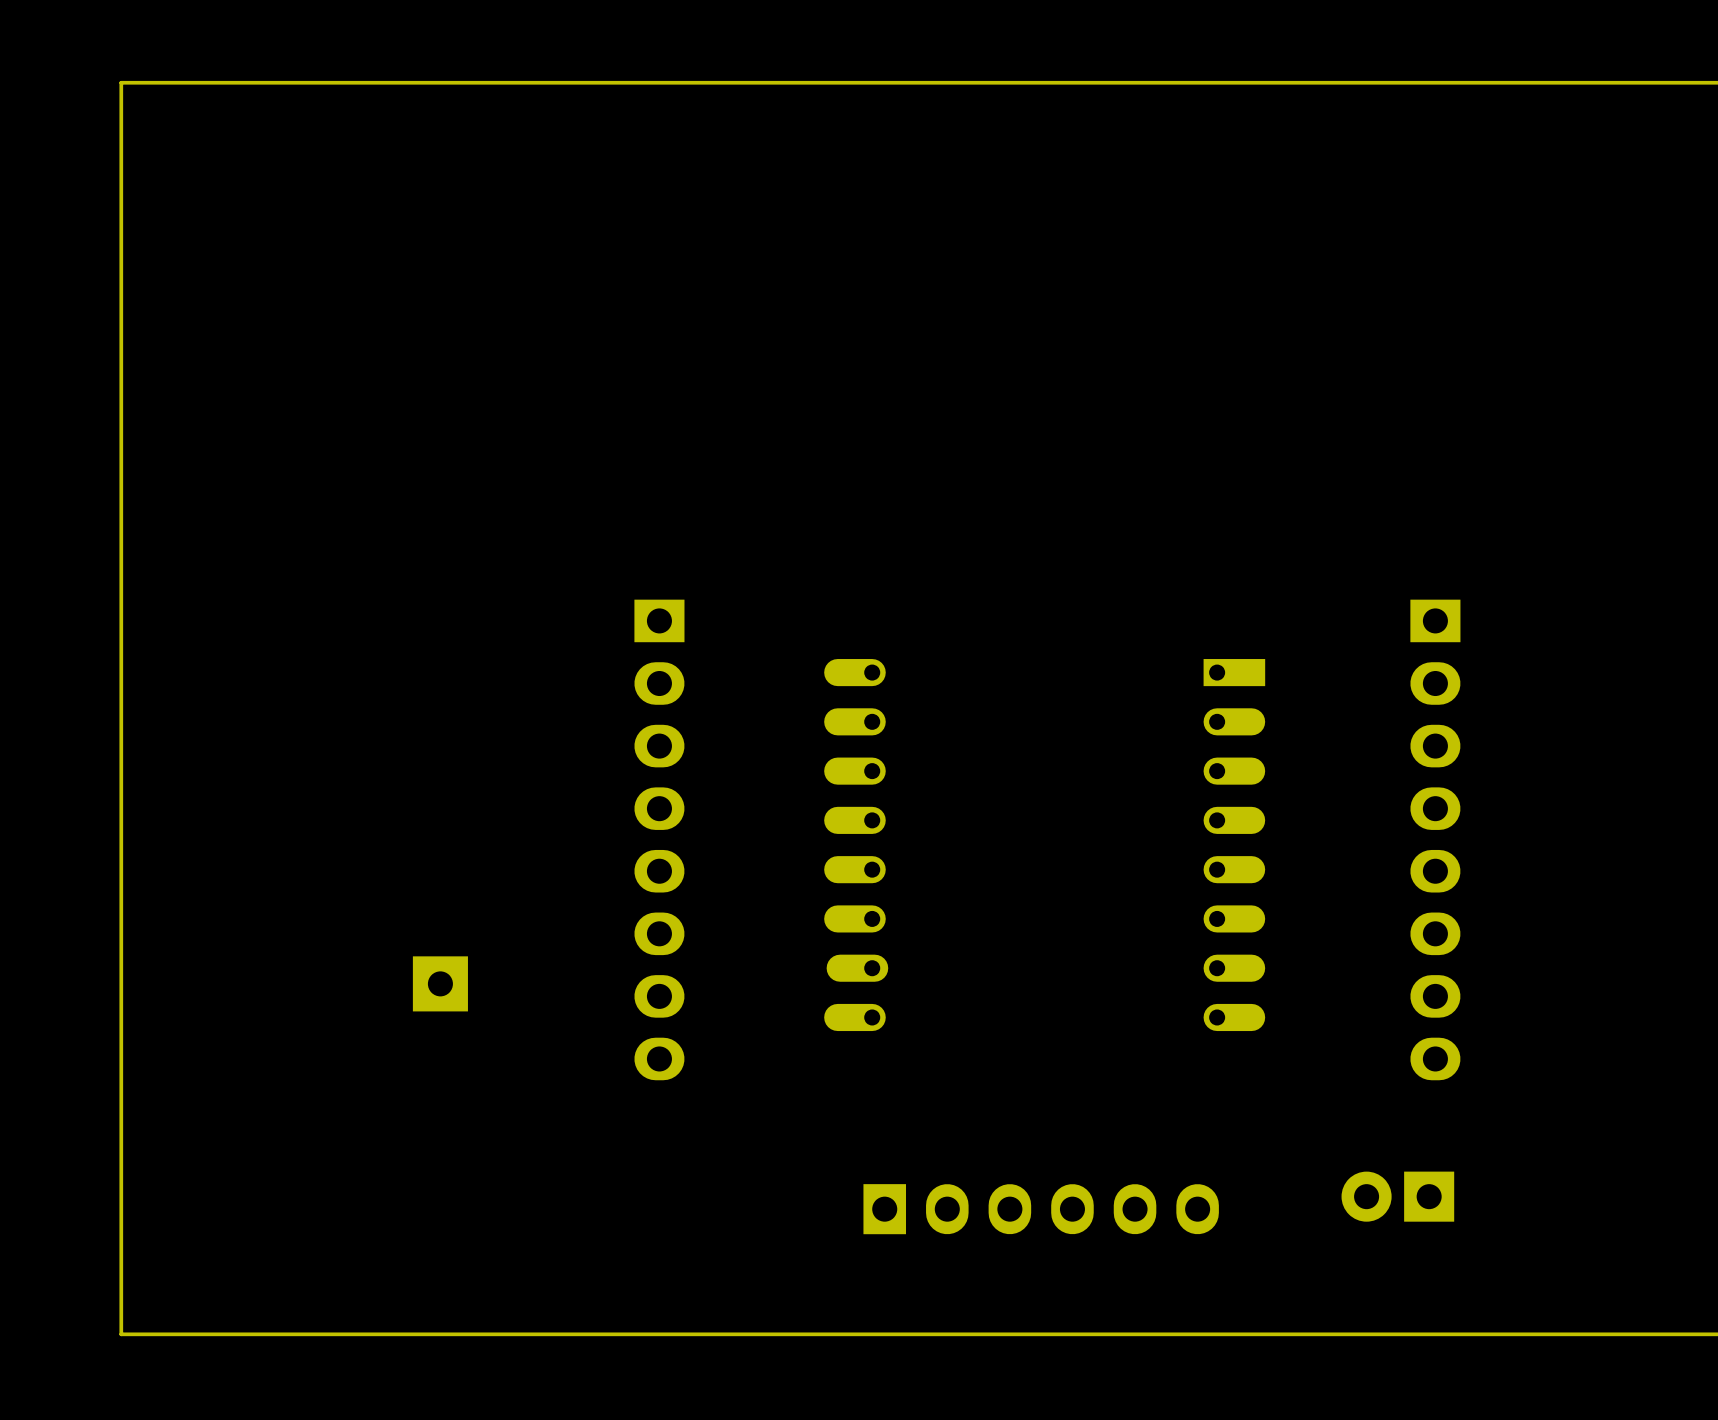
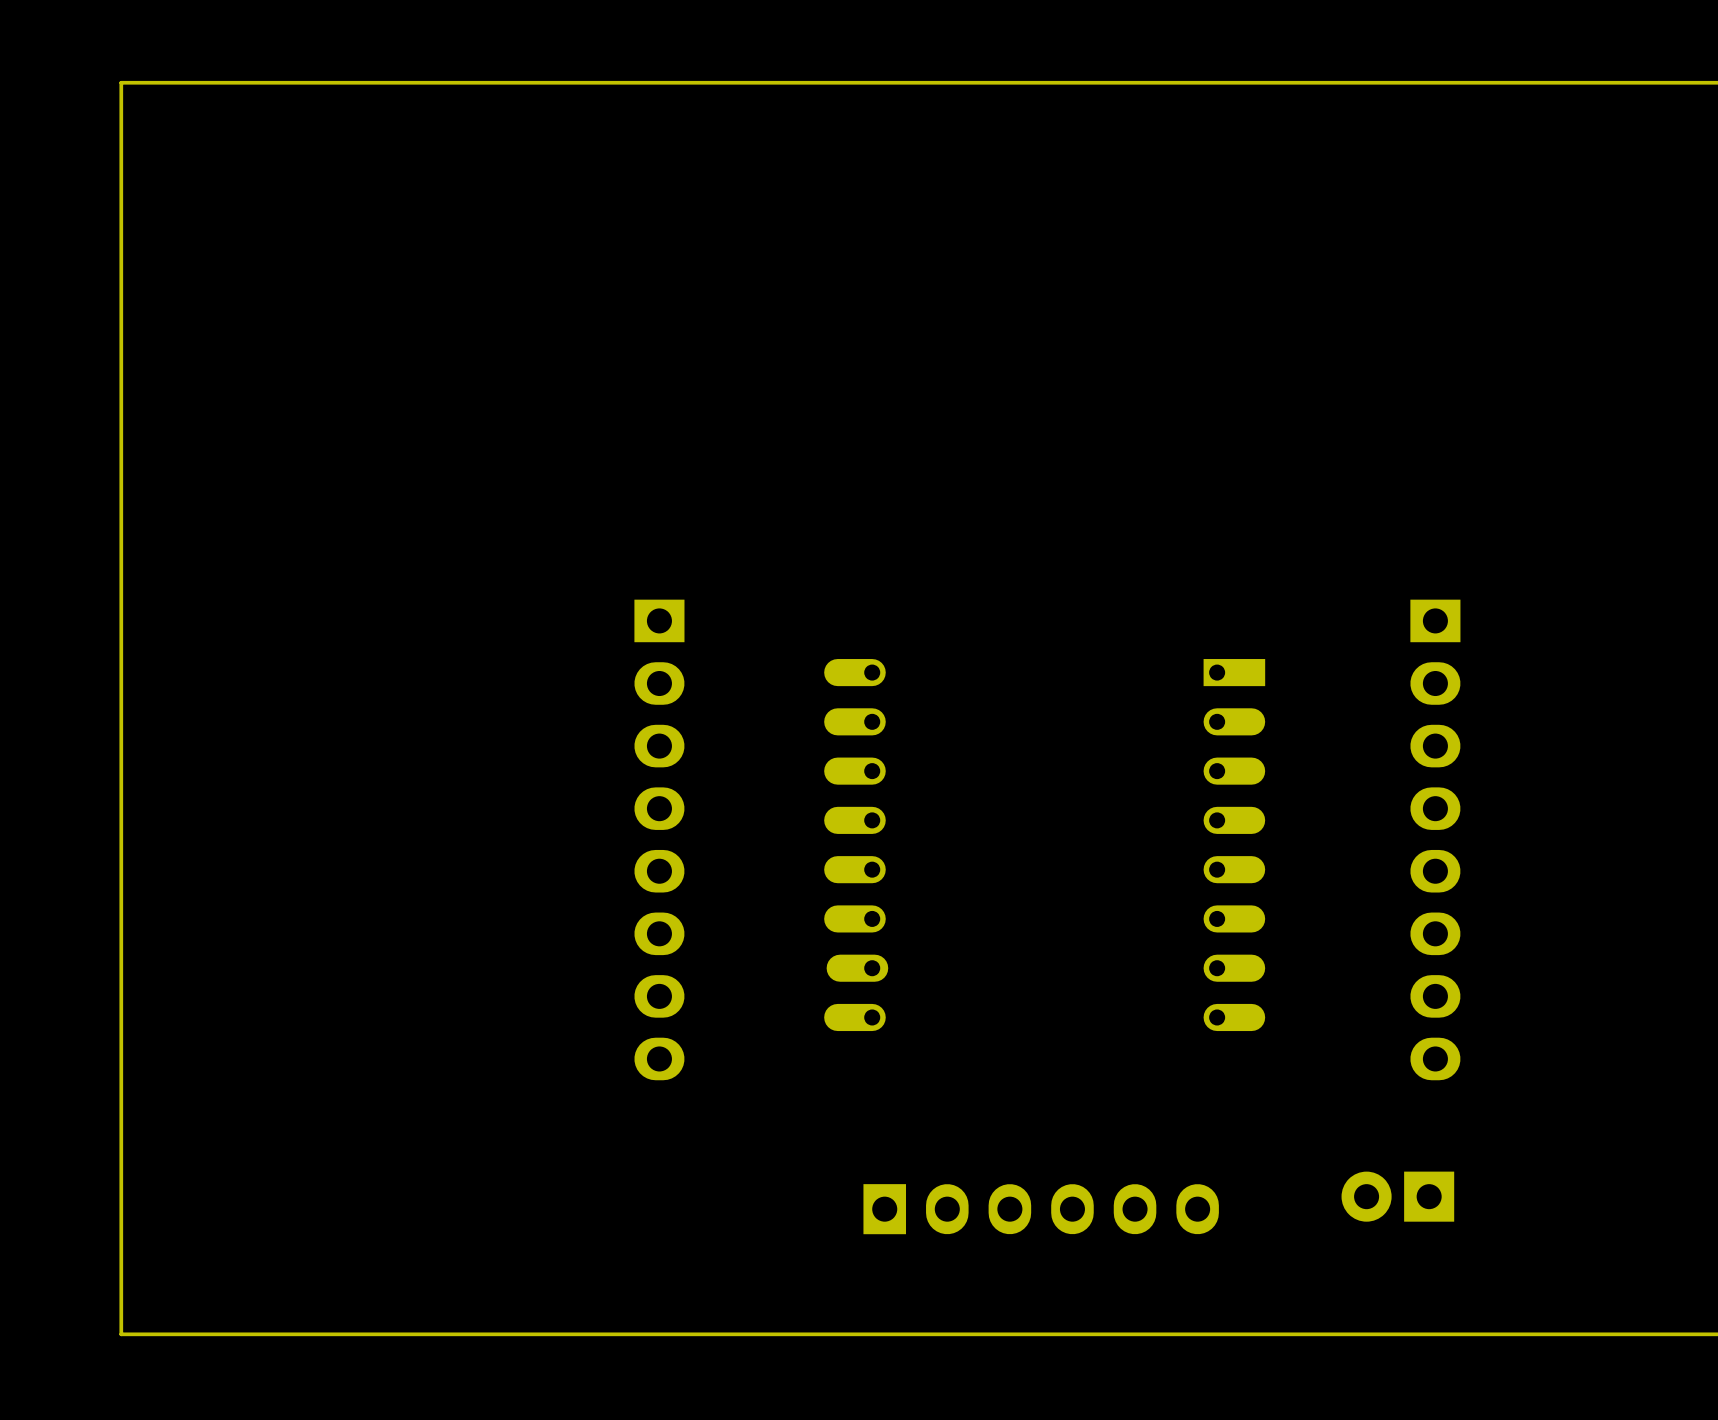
part: (440, 983) -> none

